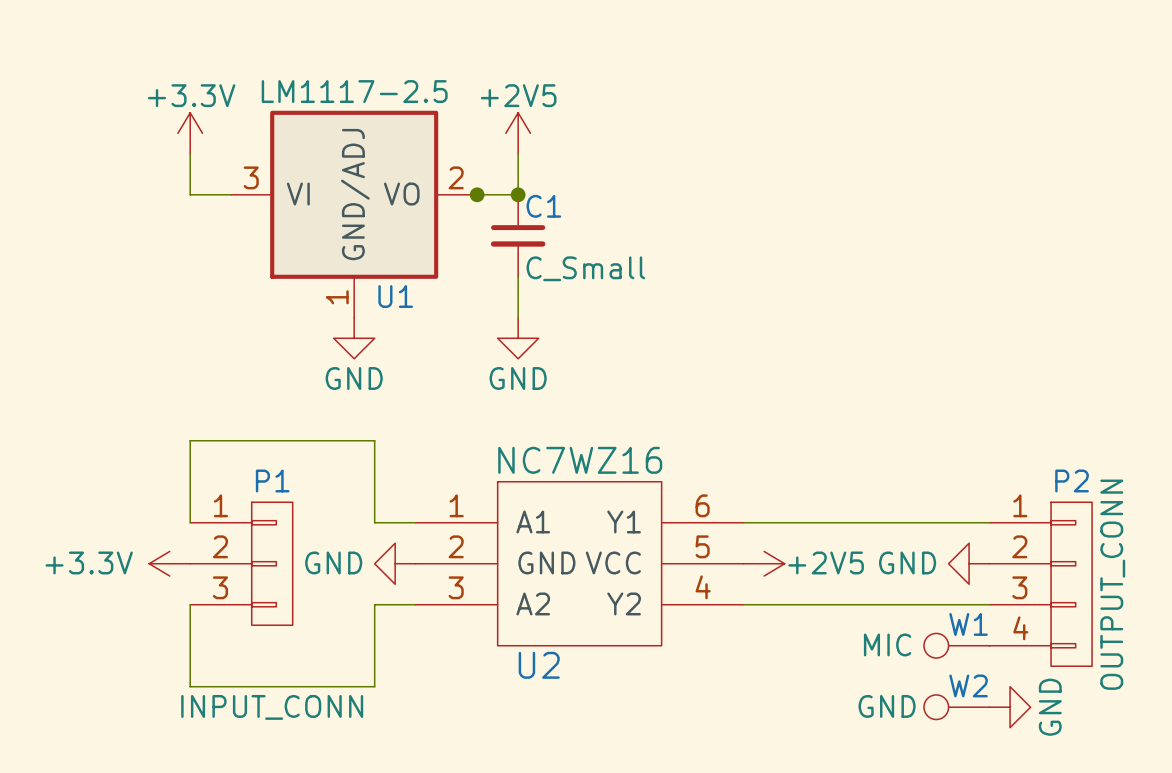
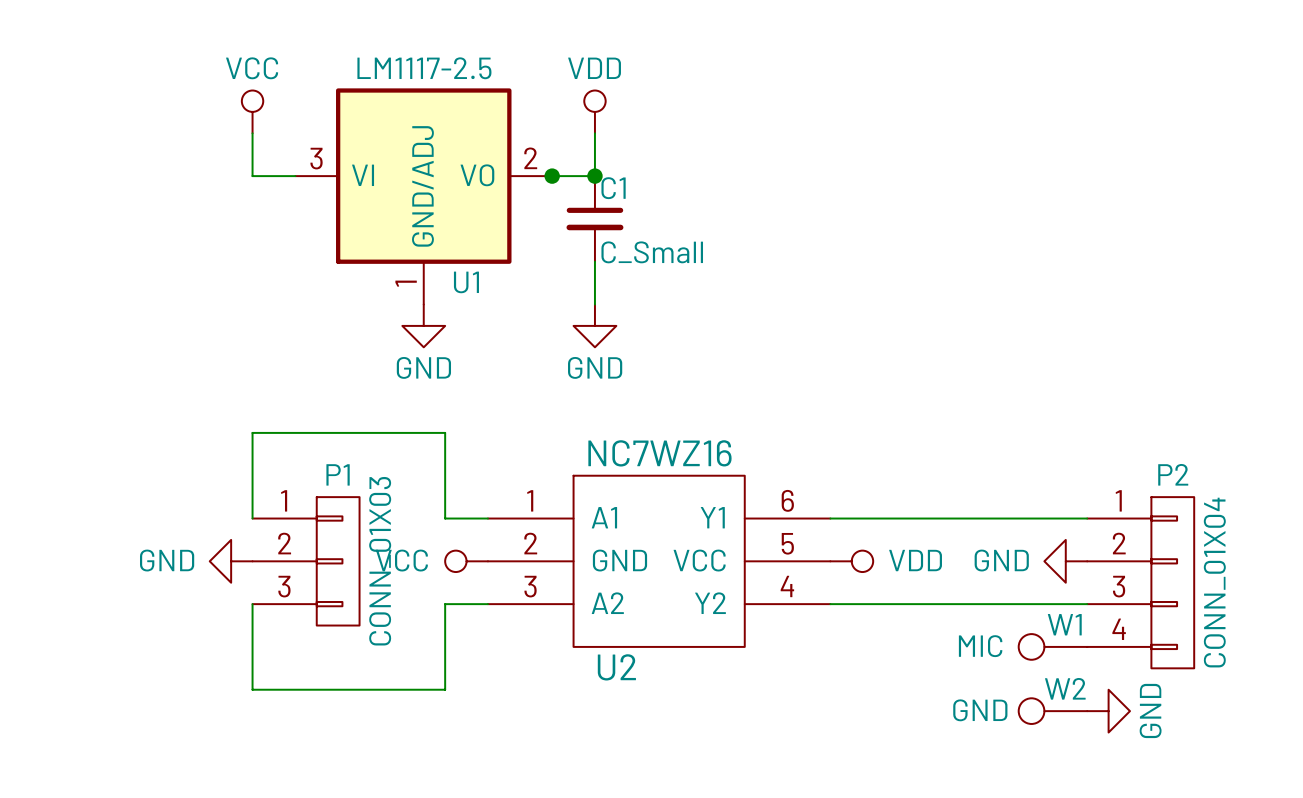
power symbol: +3.3V (190, 133) -> VCC (252, 111)
power symbol: +2V5 (518, 133) -> VDD (594, 111)
power symbol: +3.3V (169, 563) -> GND (231, 561)
power symbol: GND (395, 563) -> VCC (466, 561)
power symbol: +2V5 (764, 563) -> VDD (851, 561)
P2 value: OUTPUT_CONN (1112, 584) -> CONN_01X04 (1214, 582)
P1 value: INPUT_CONN (272, 707) -> CONN_01X03 (380, 561)

